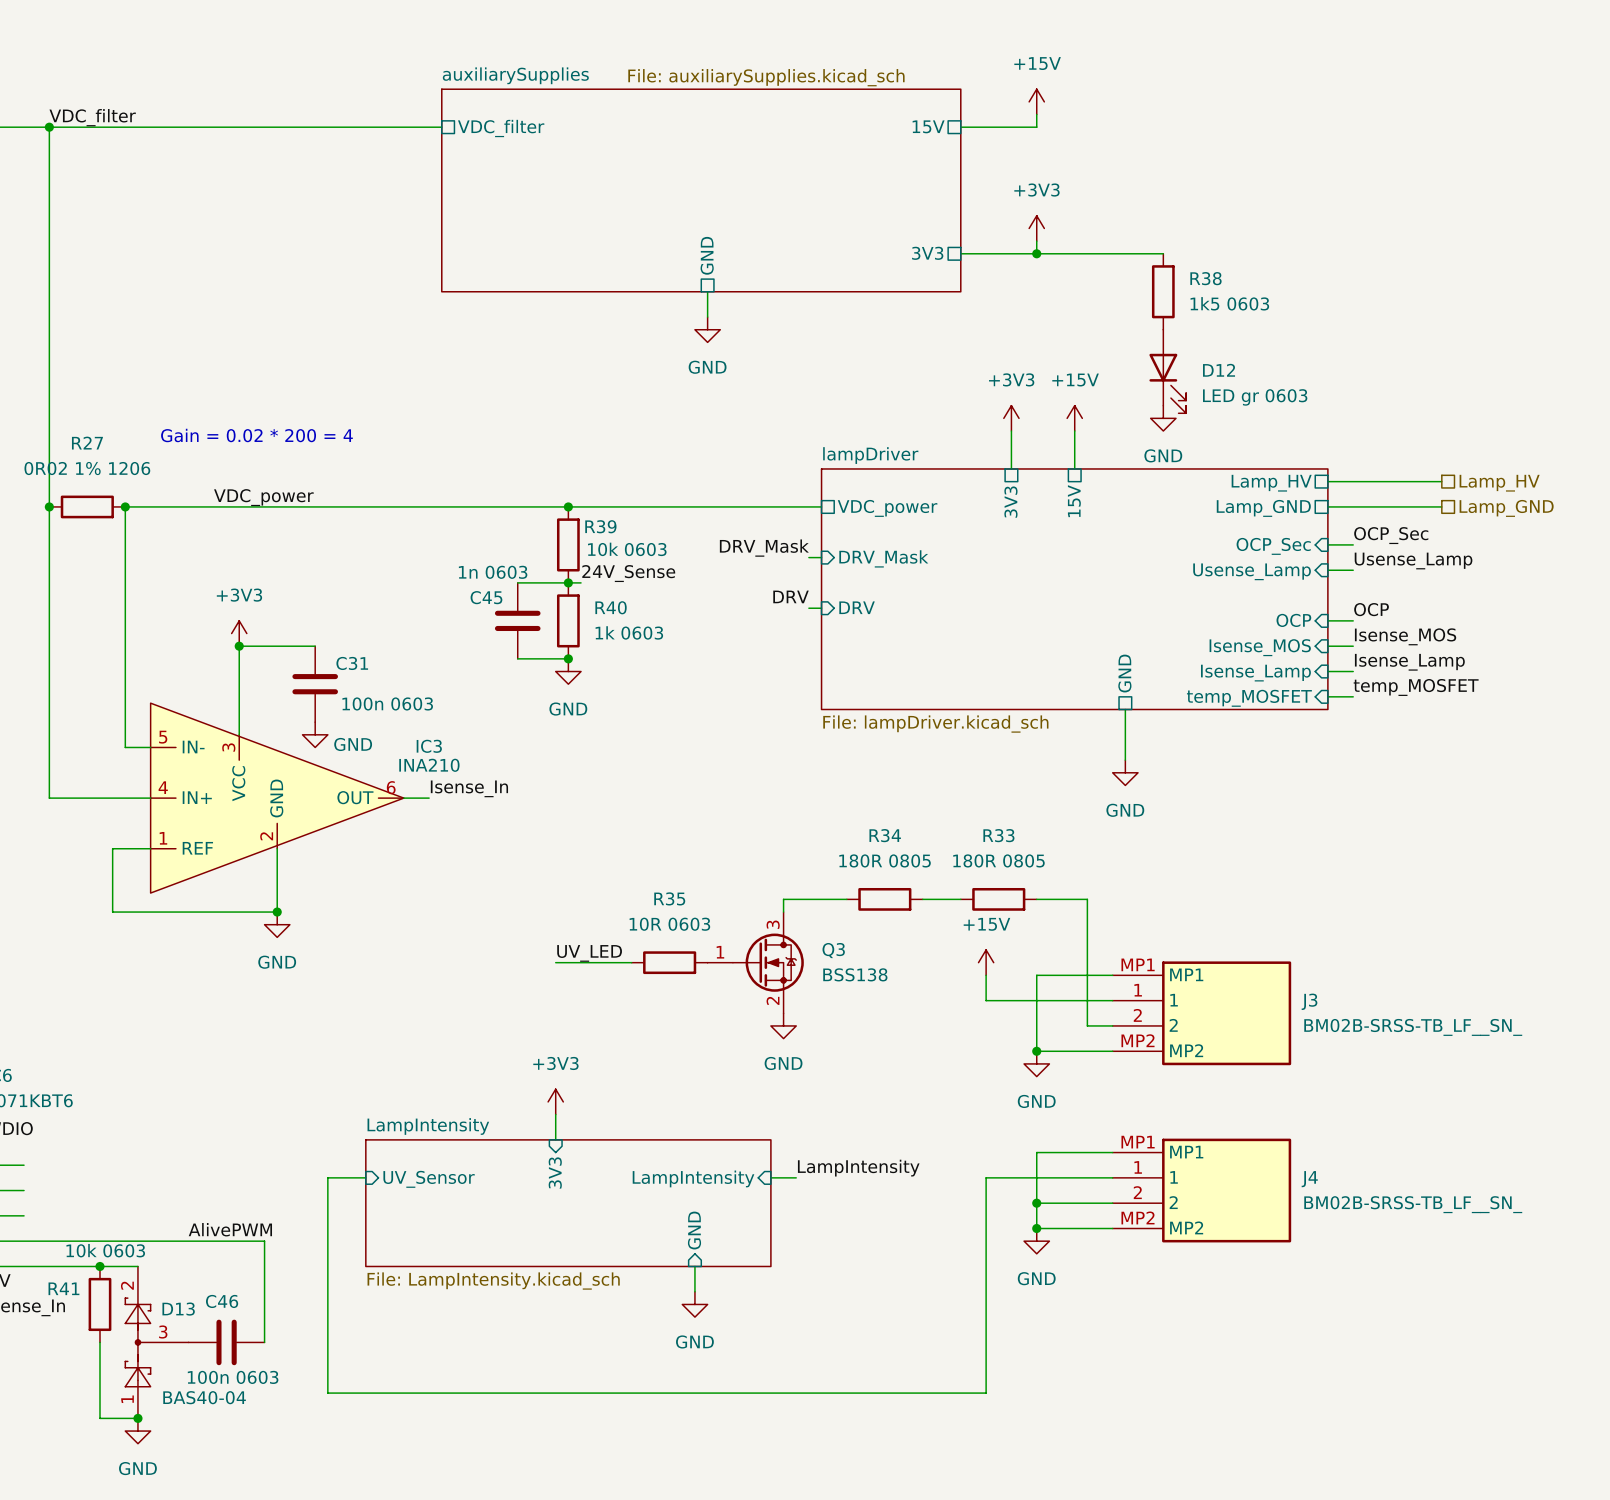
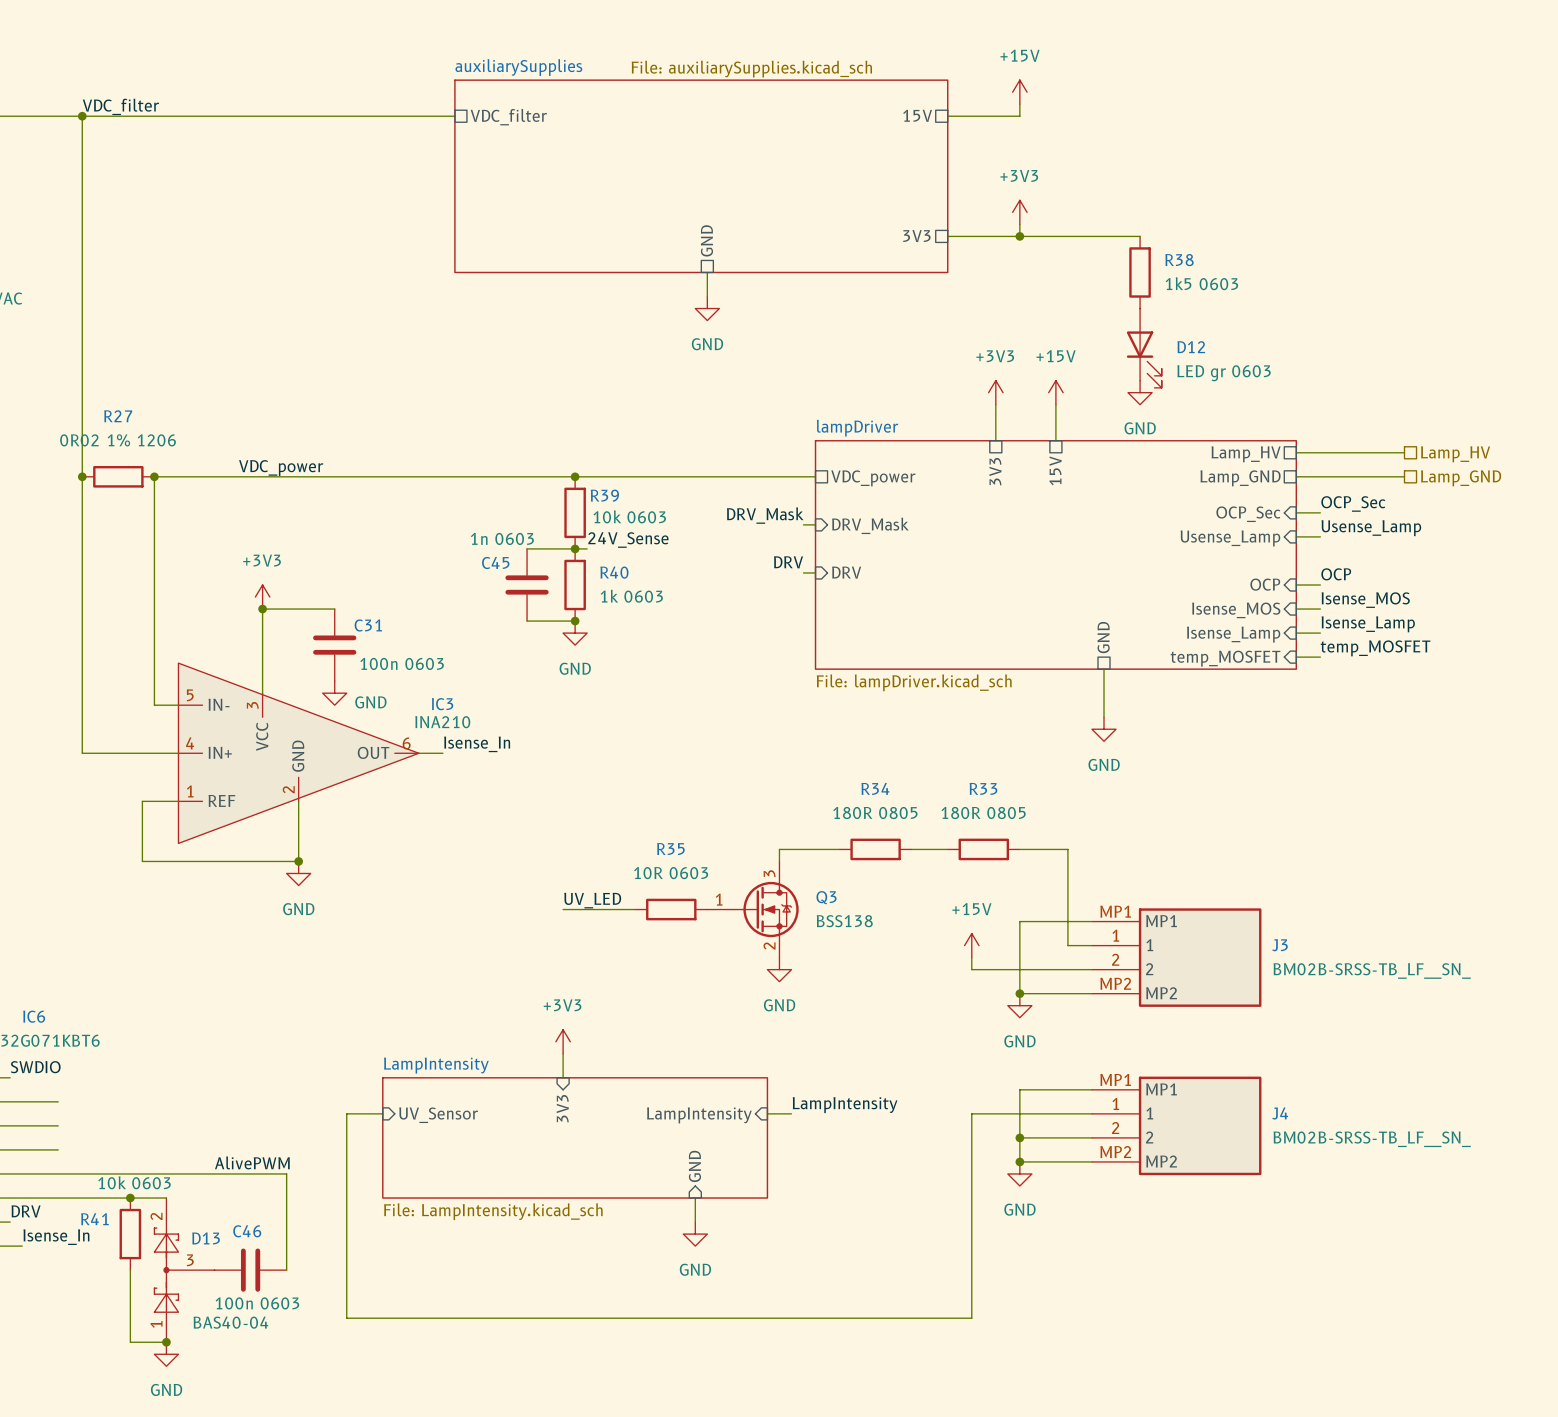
text: Gain = 0.02 * 200 = 4 (256, 435) -> none
power symbol position: +15V (986, 962) -> +15V (971, 945)
wire: (986, 975) (986, 1000) (1087, 1000) (1087, 1025) -> (971, 957) (971, 969) (1067, 969)

